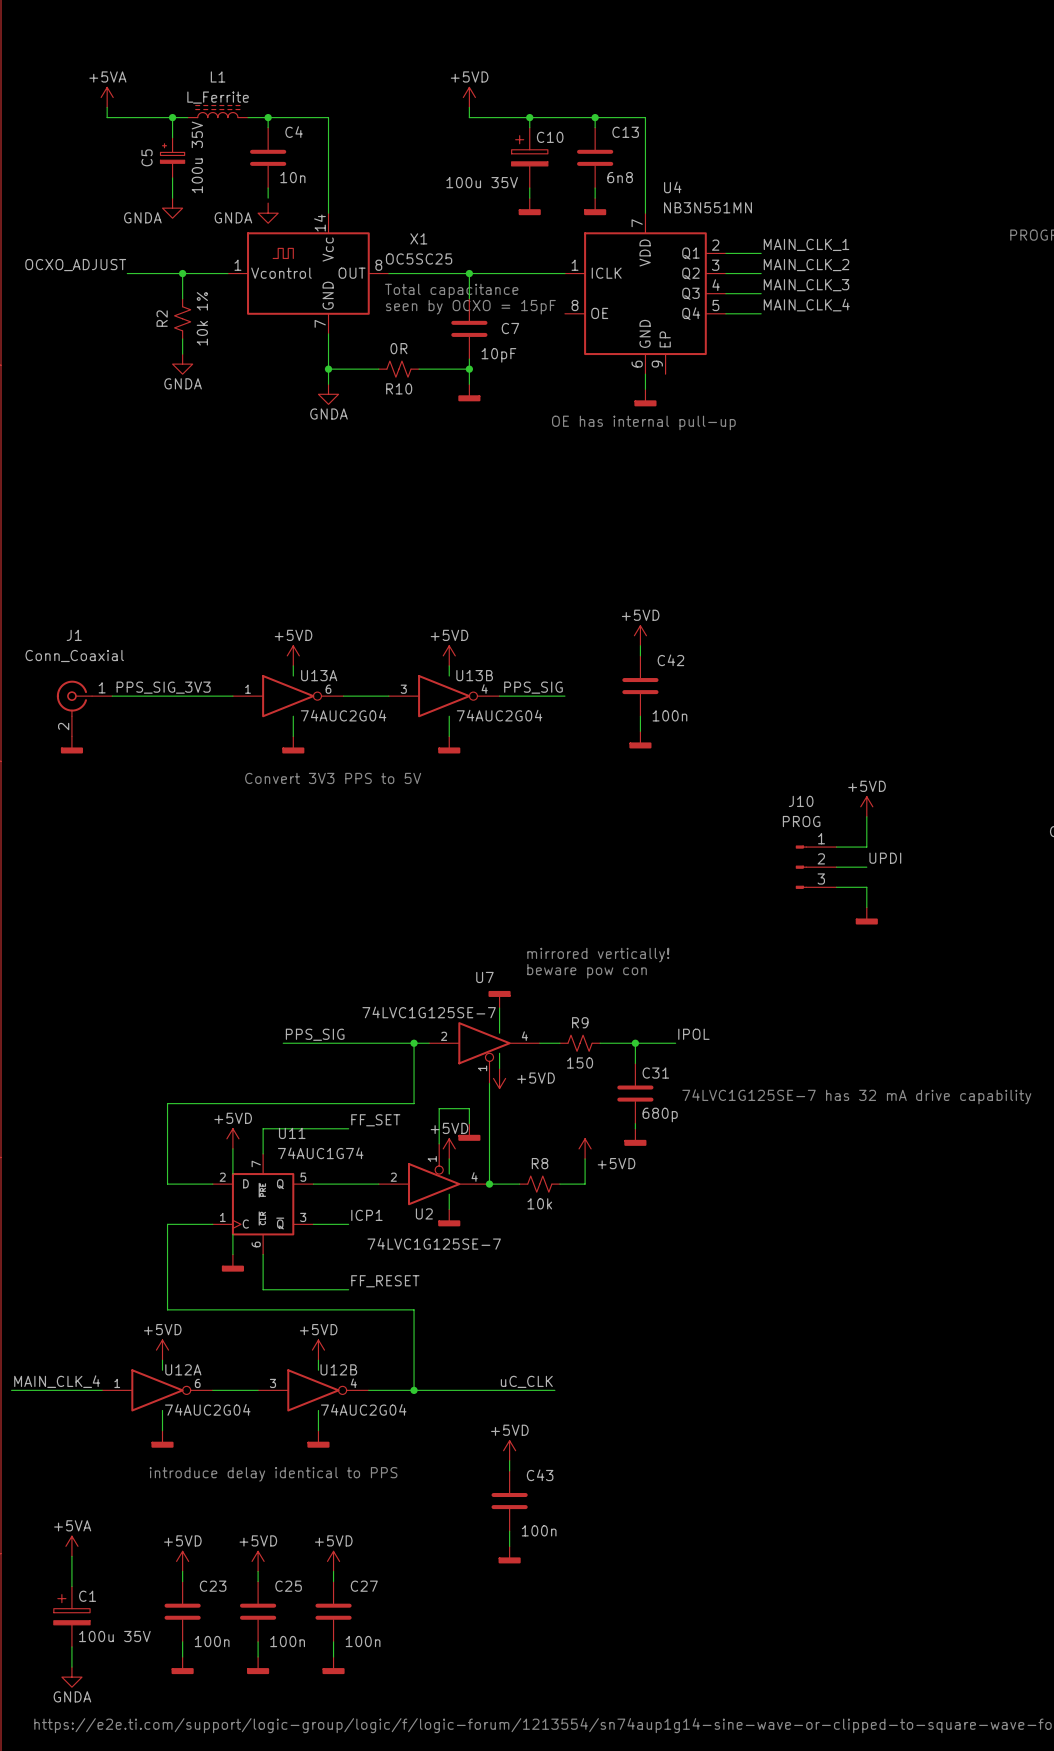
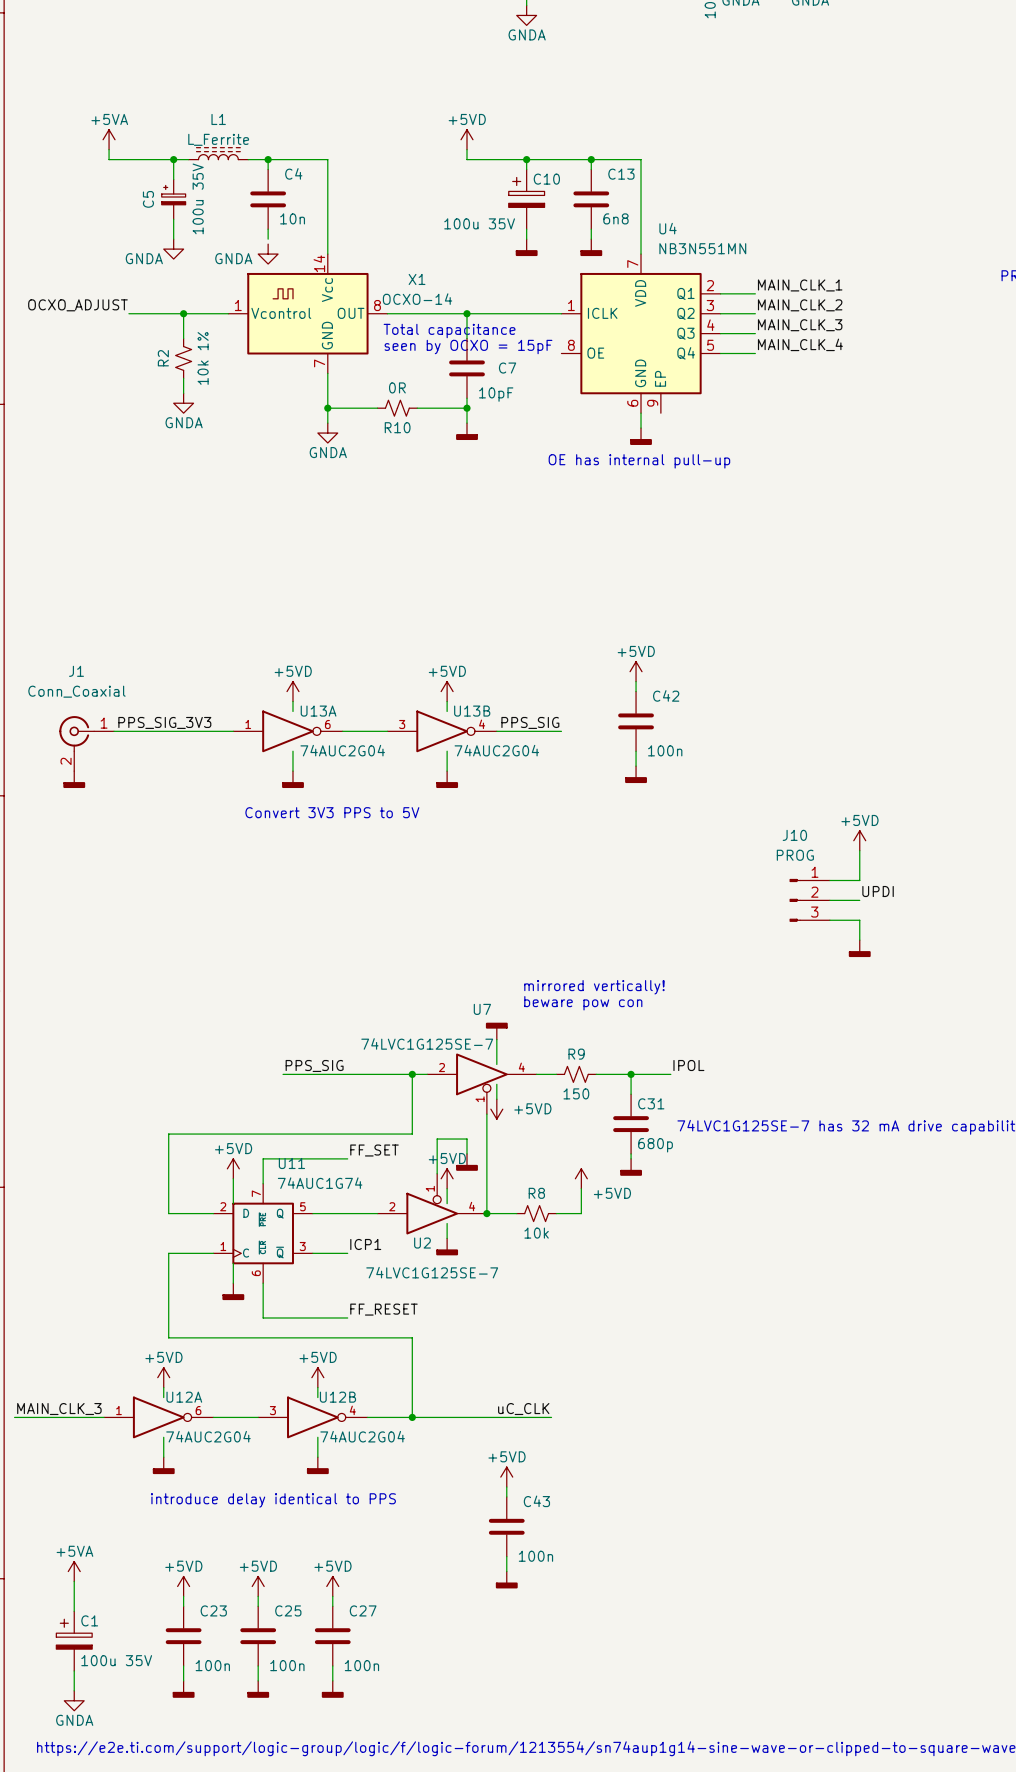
X1 value: OC5SC25 (419, 258) -> OCXO-14 (417, 299)
label: MAIN_CLK_4 (57, 1381) -> MAIN_CLK_3 (59, 1409)

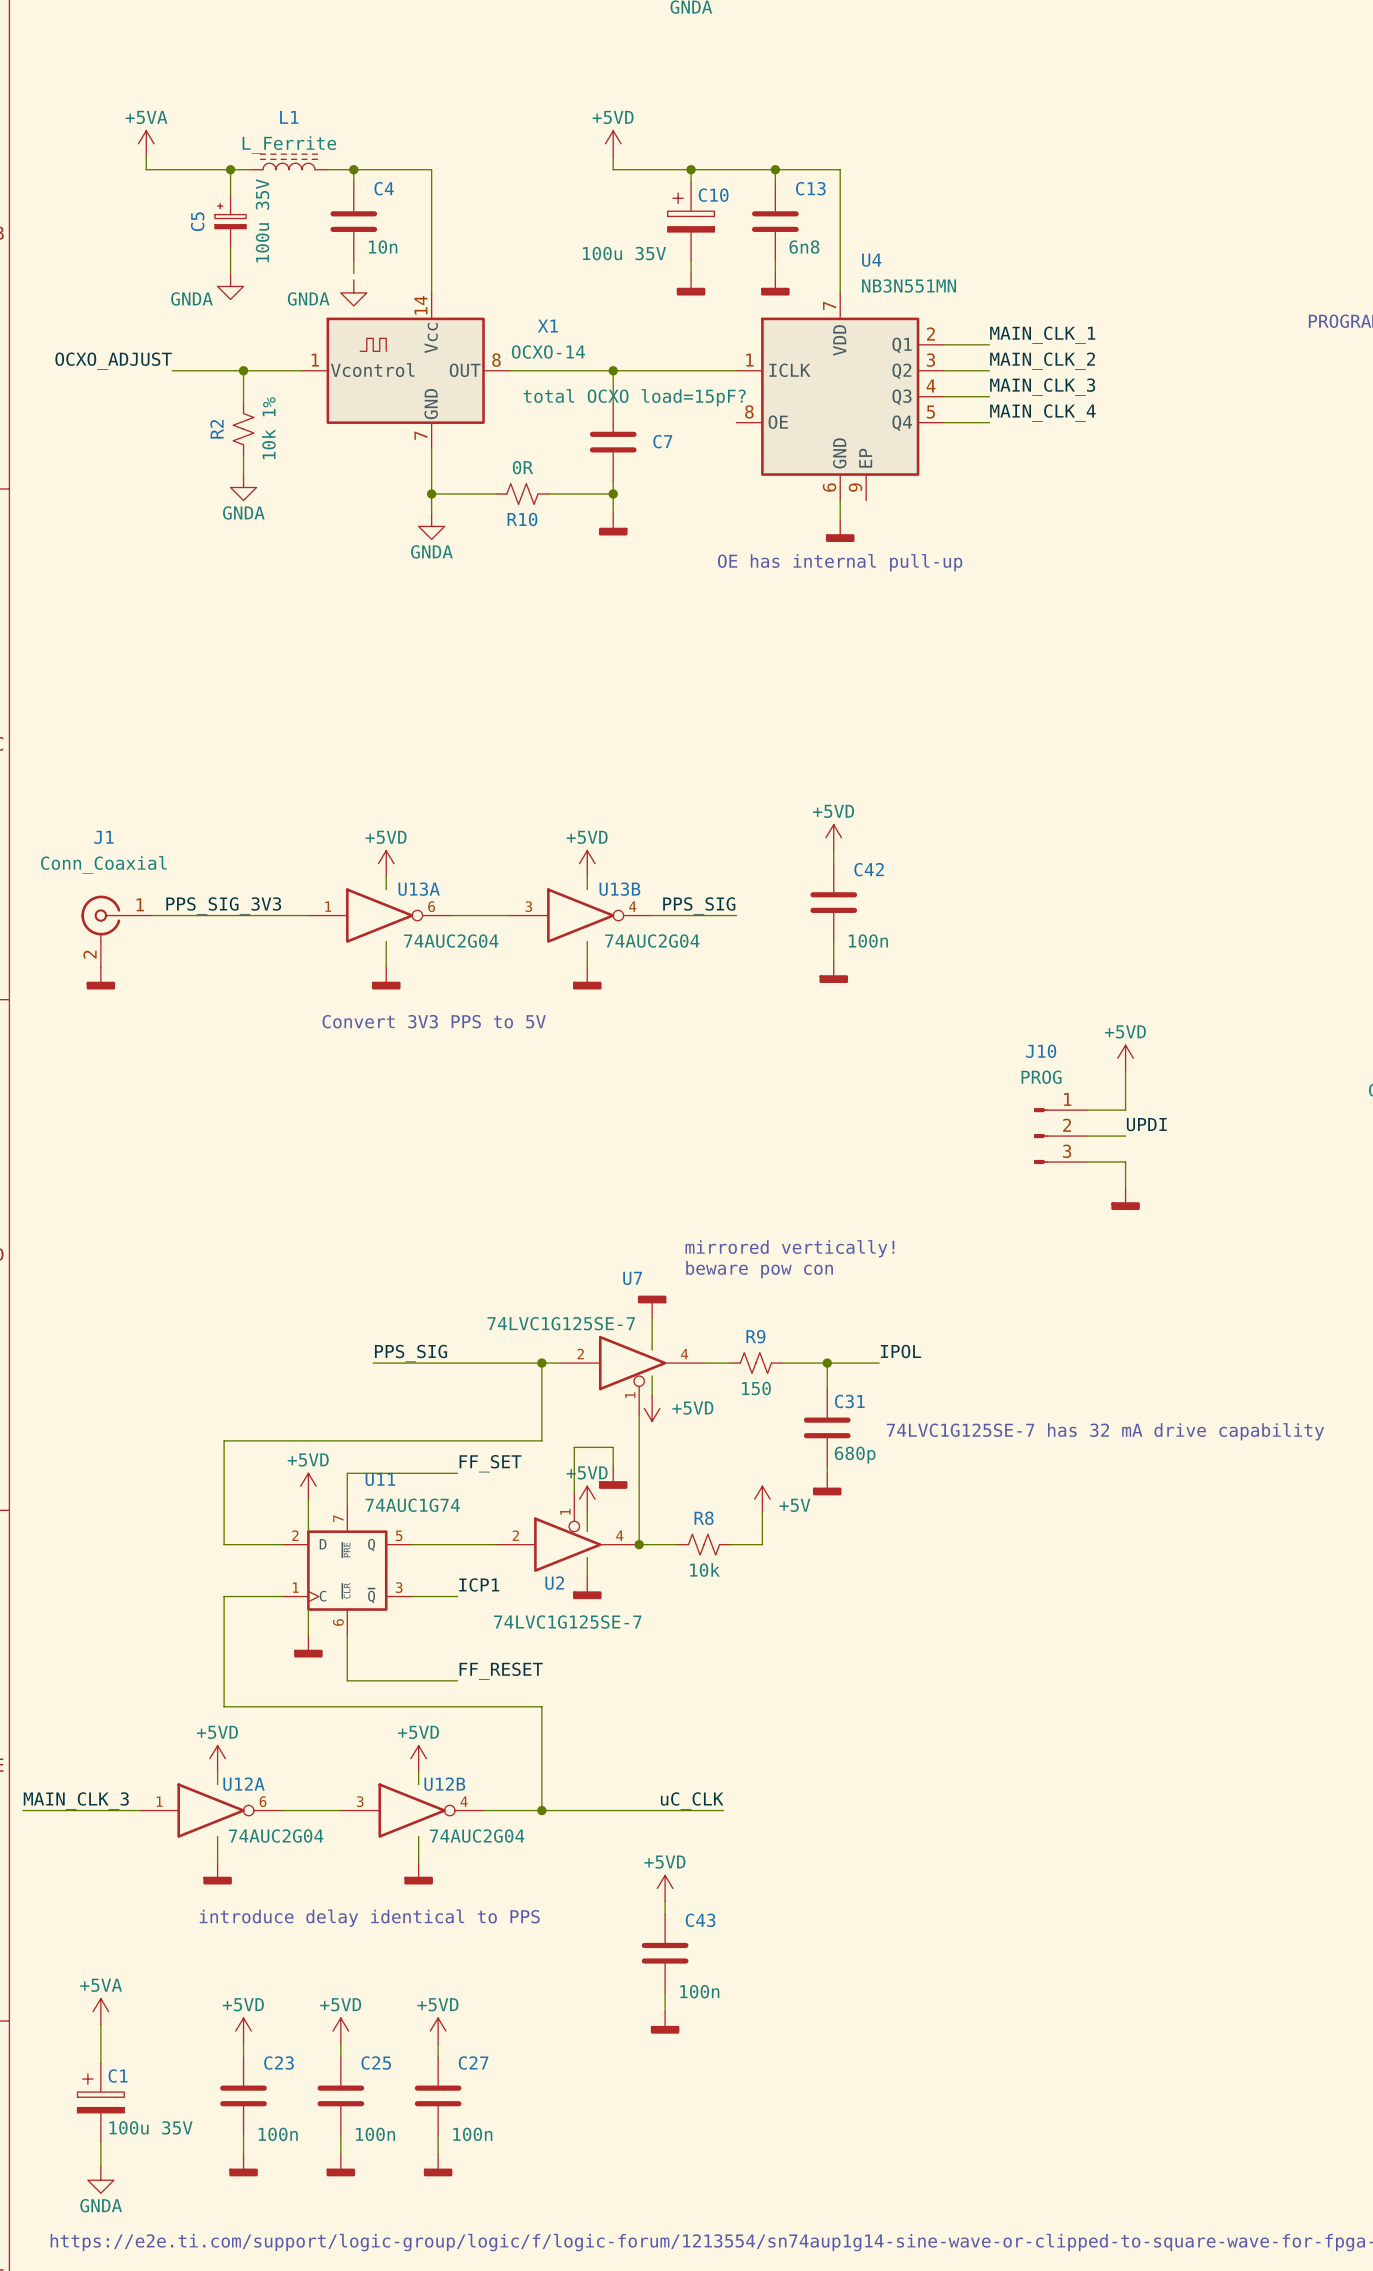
text: Total capacitance (449, 331) -> none
text: seen by OCXO = 15pF (468, 347) -> none
C7 value: 10pF (496, 394) -> total OCXO load=15pF? (634, 397)
power symbol: +5VD (581, 1178) -> +5V (762, 1499)

